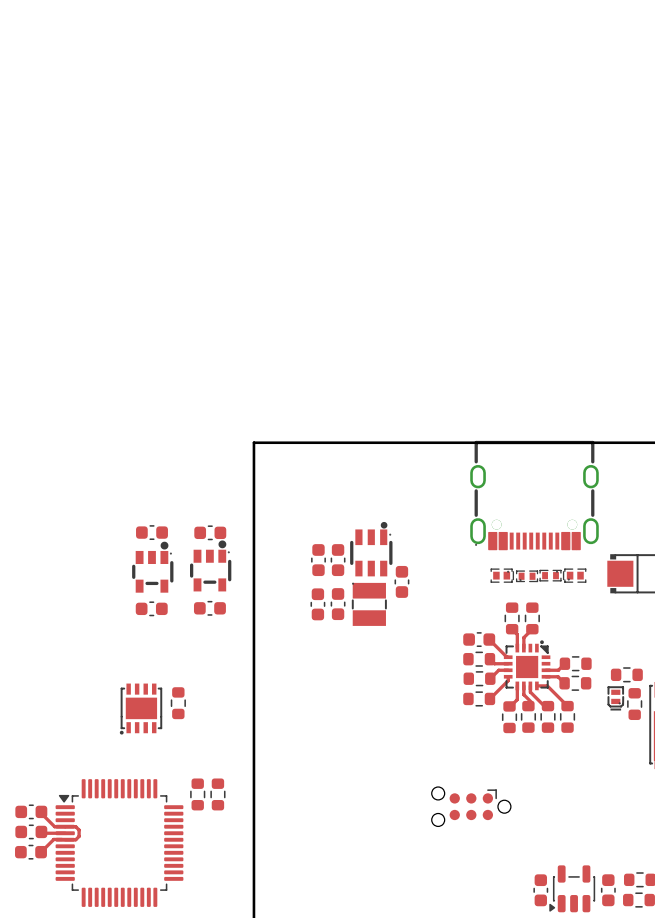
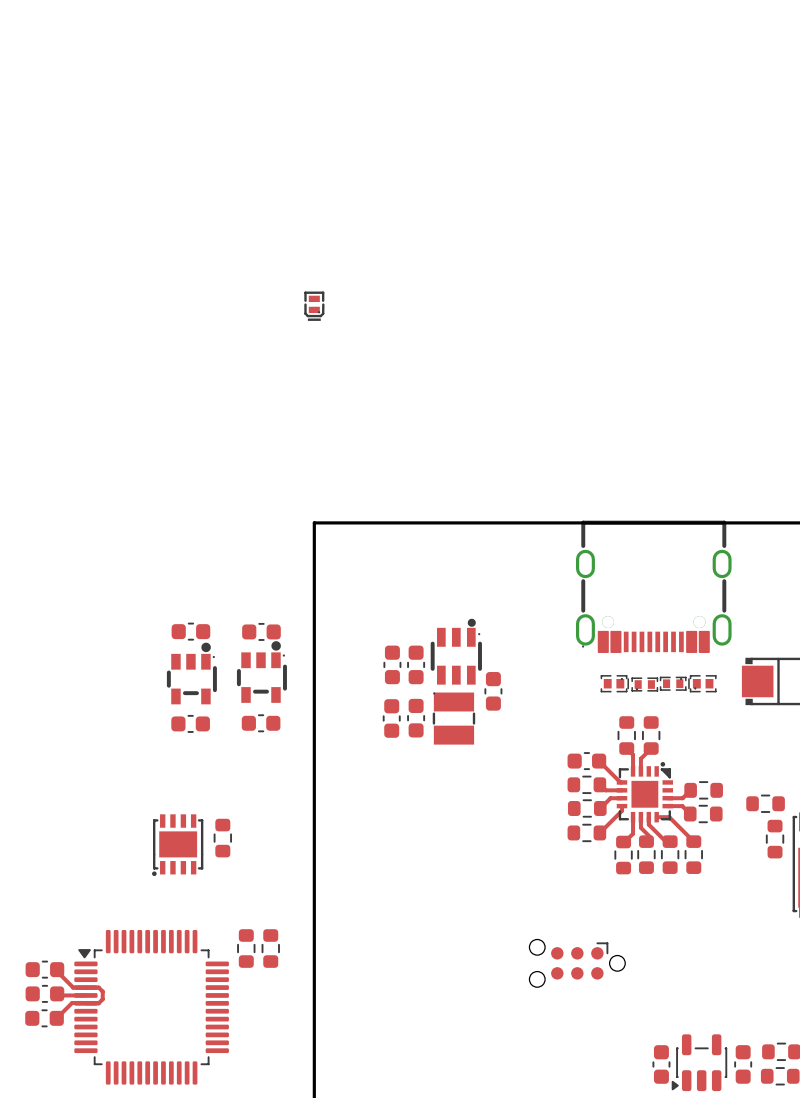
part: none -> (314, 306)
part: (615, 698) -> none

